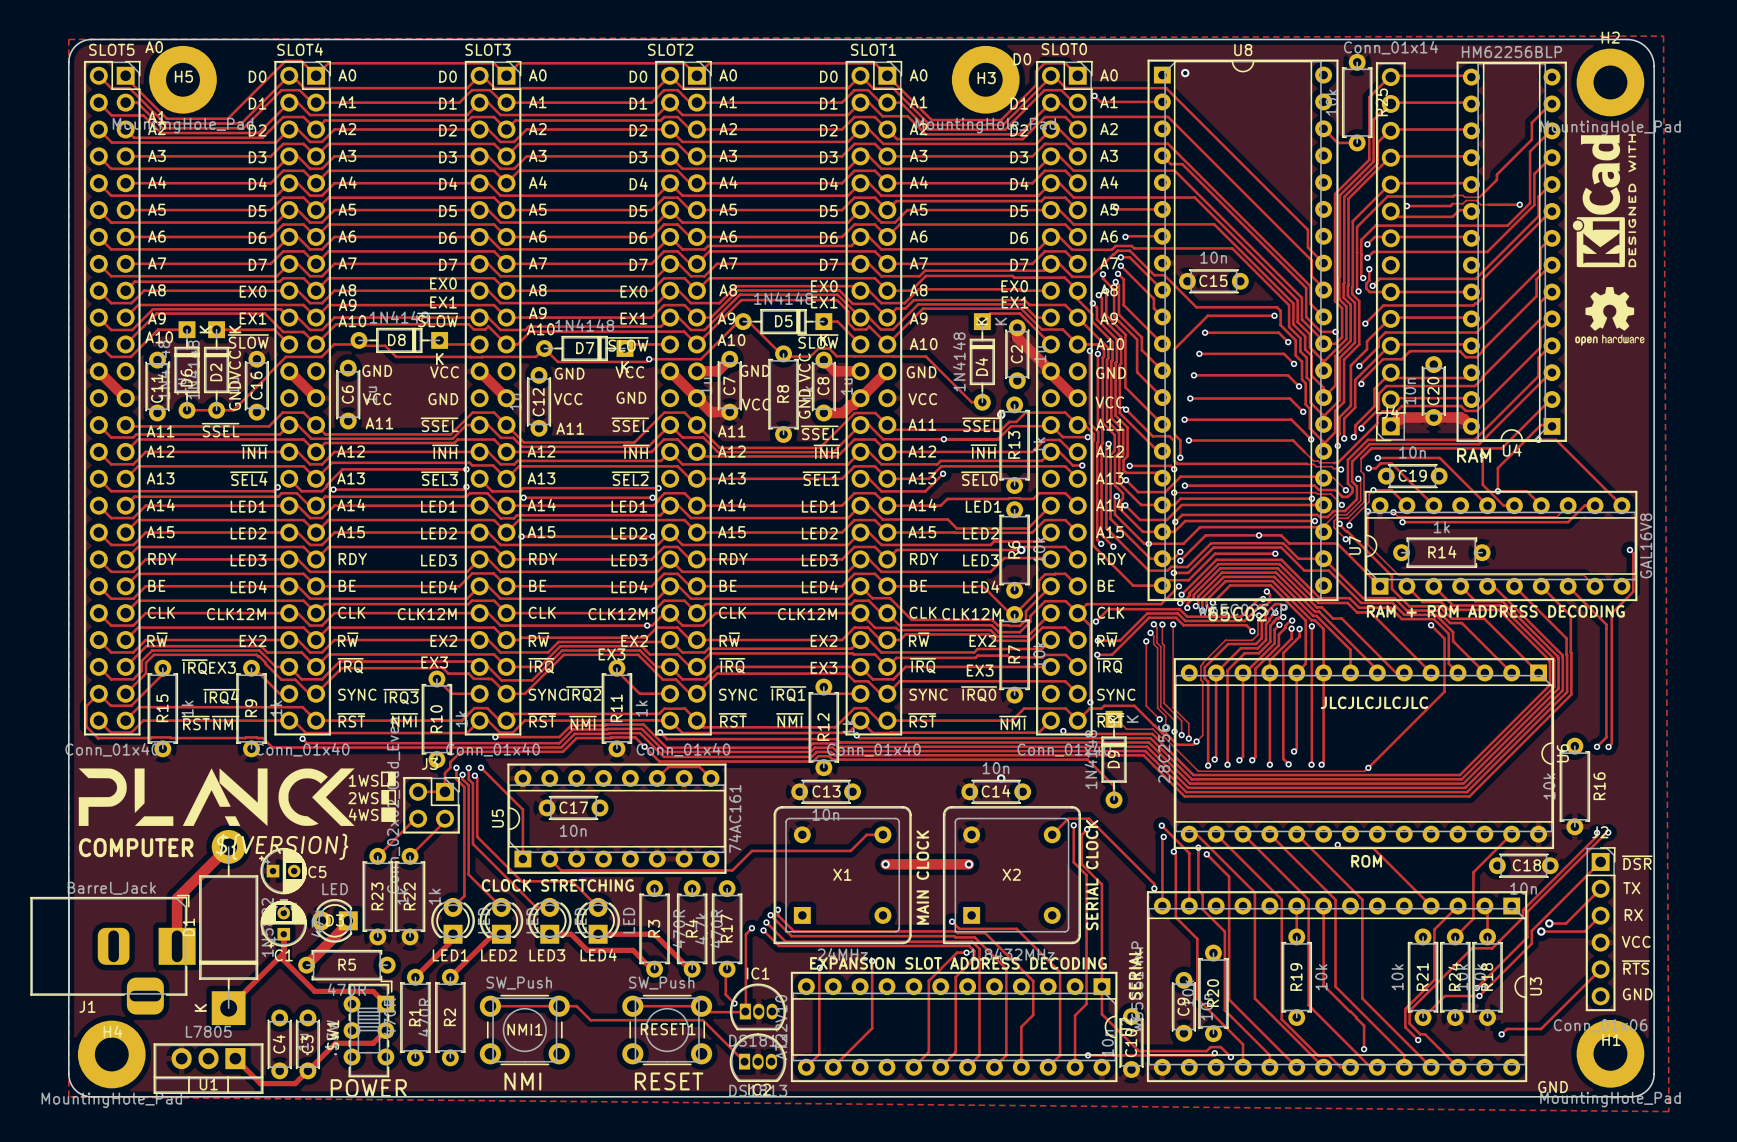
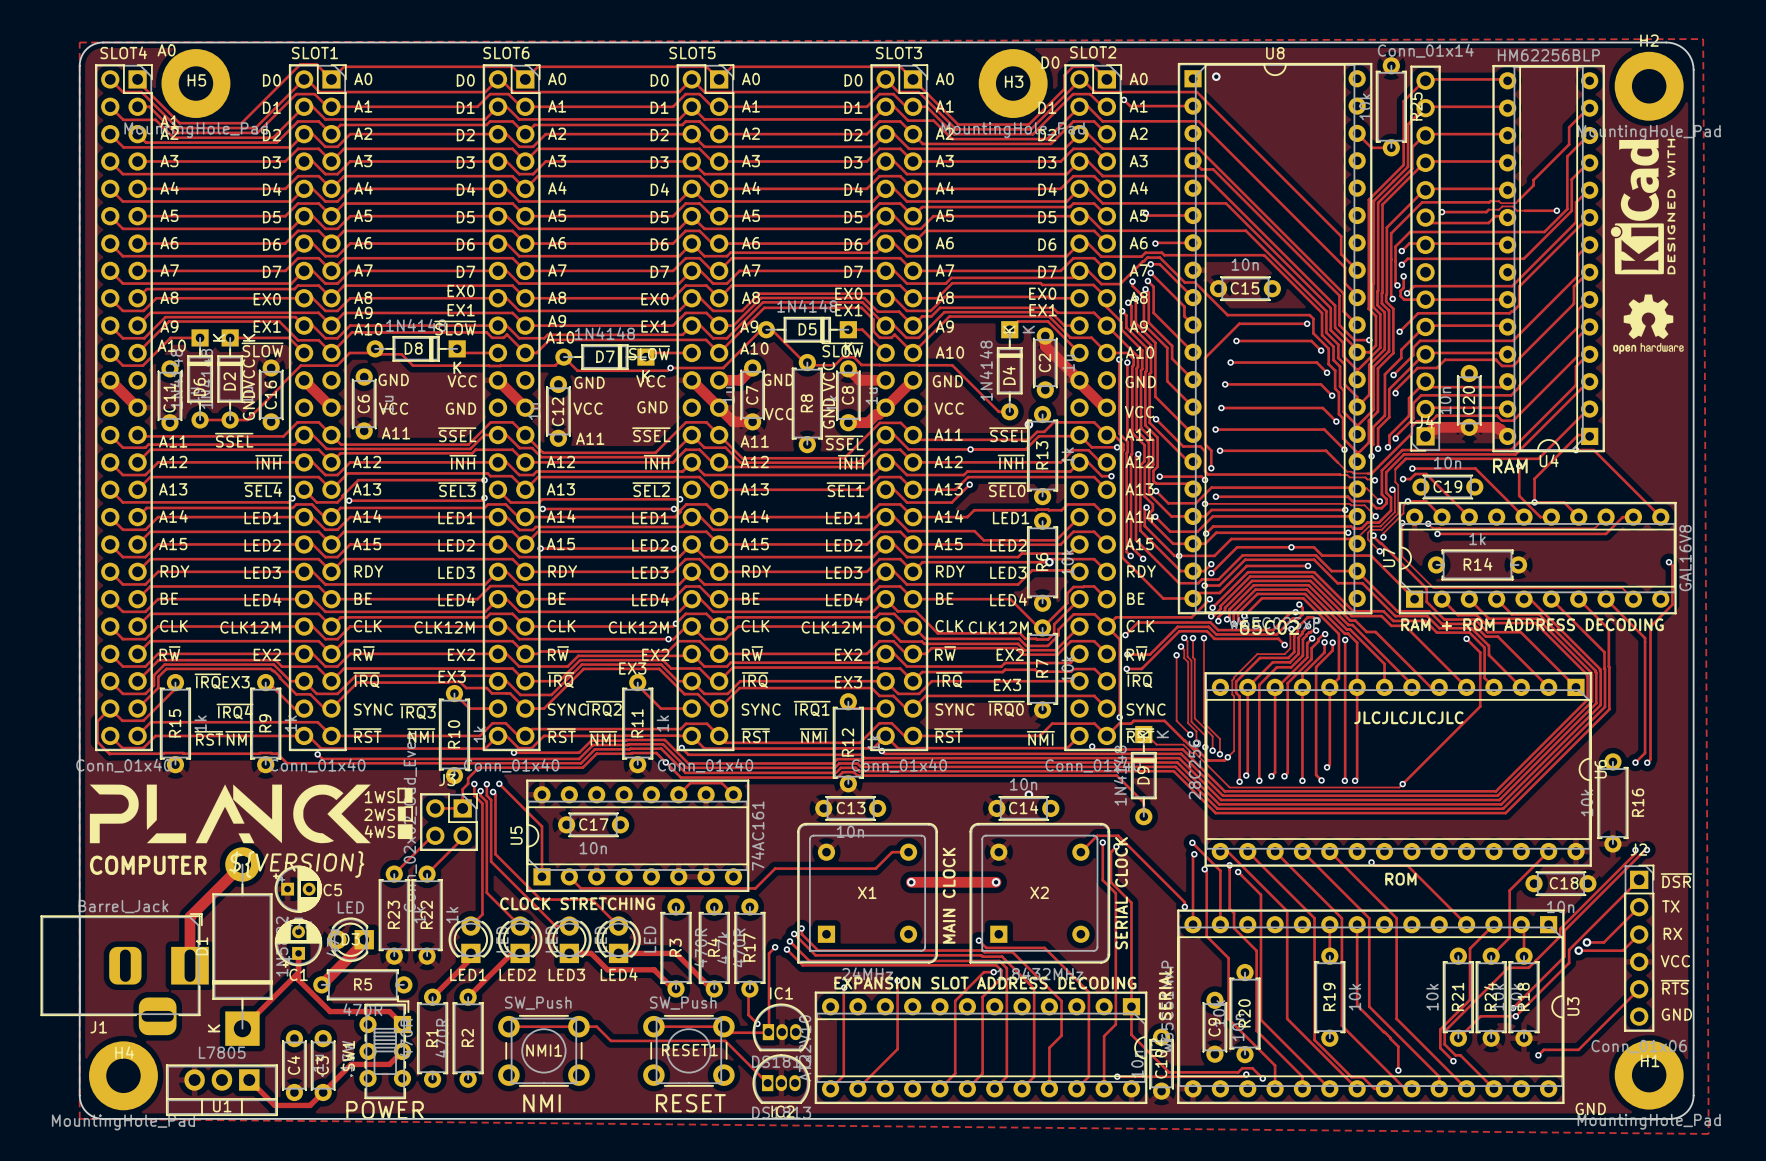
SLOT5 name: SLOT5 (111, 49) -> SLOT4 (123, 52)
SLOT4 name: SLOT4 (300, 49) -> SLOT1 (314, 53)
SLOT3 name: SLOT3 (487, 49) -> SLOT6 (506, 53)
SLOT2 name: SLOT2 (670, 49) -> SLOT5 (692, 53)
SLOT1 name: SLOT1 (873, 49) -> SLOT3 (898, 53)
SLOT0 name: SLOT0 (1064, 49) -> SLOT2 (1093, 52)

